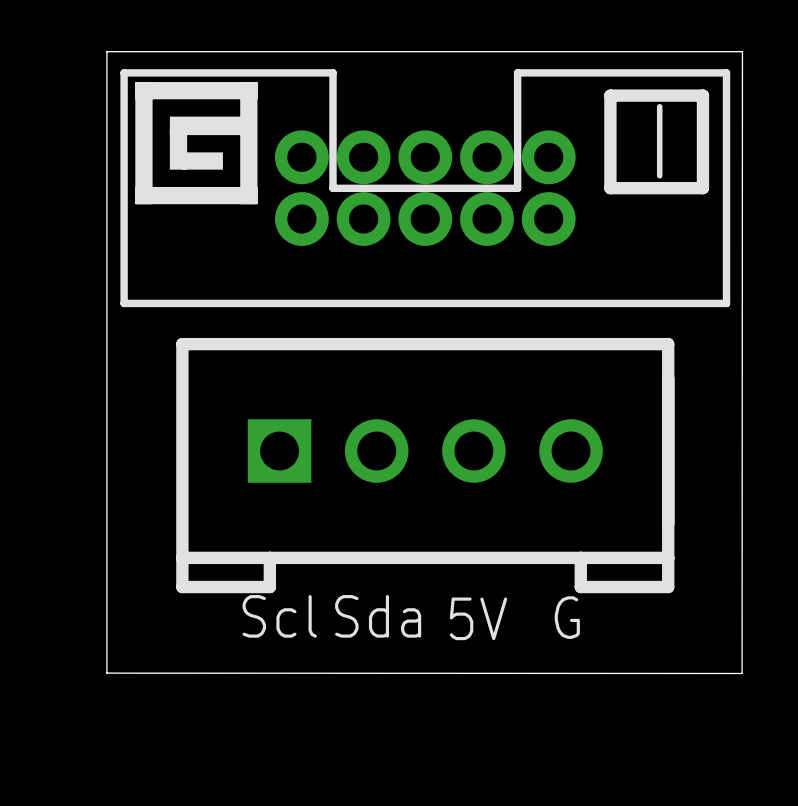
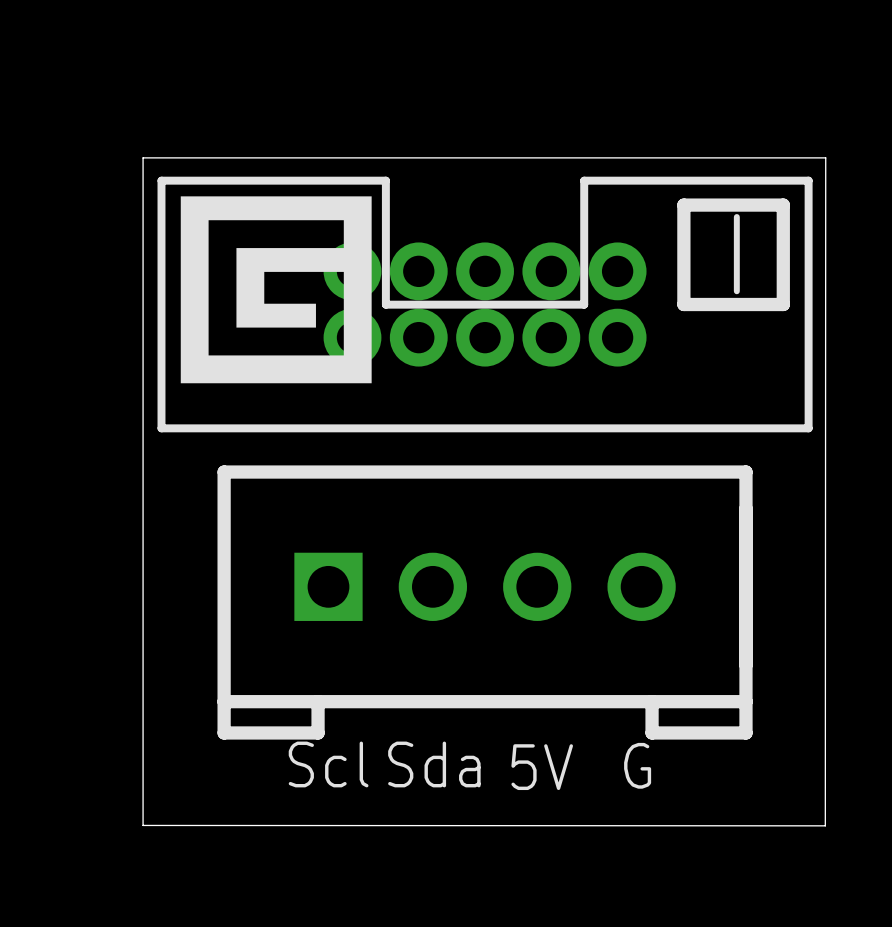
drawing: [135, 82, 258, 205] -> none
drawing: none -> [180, 196, 372, 384]
drawing shape: [135, 186, 258, 205] -> [236, 299, 265, 304]

